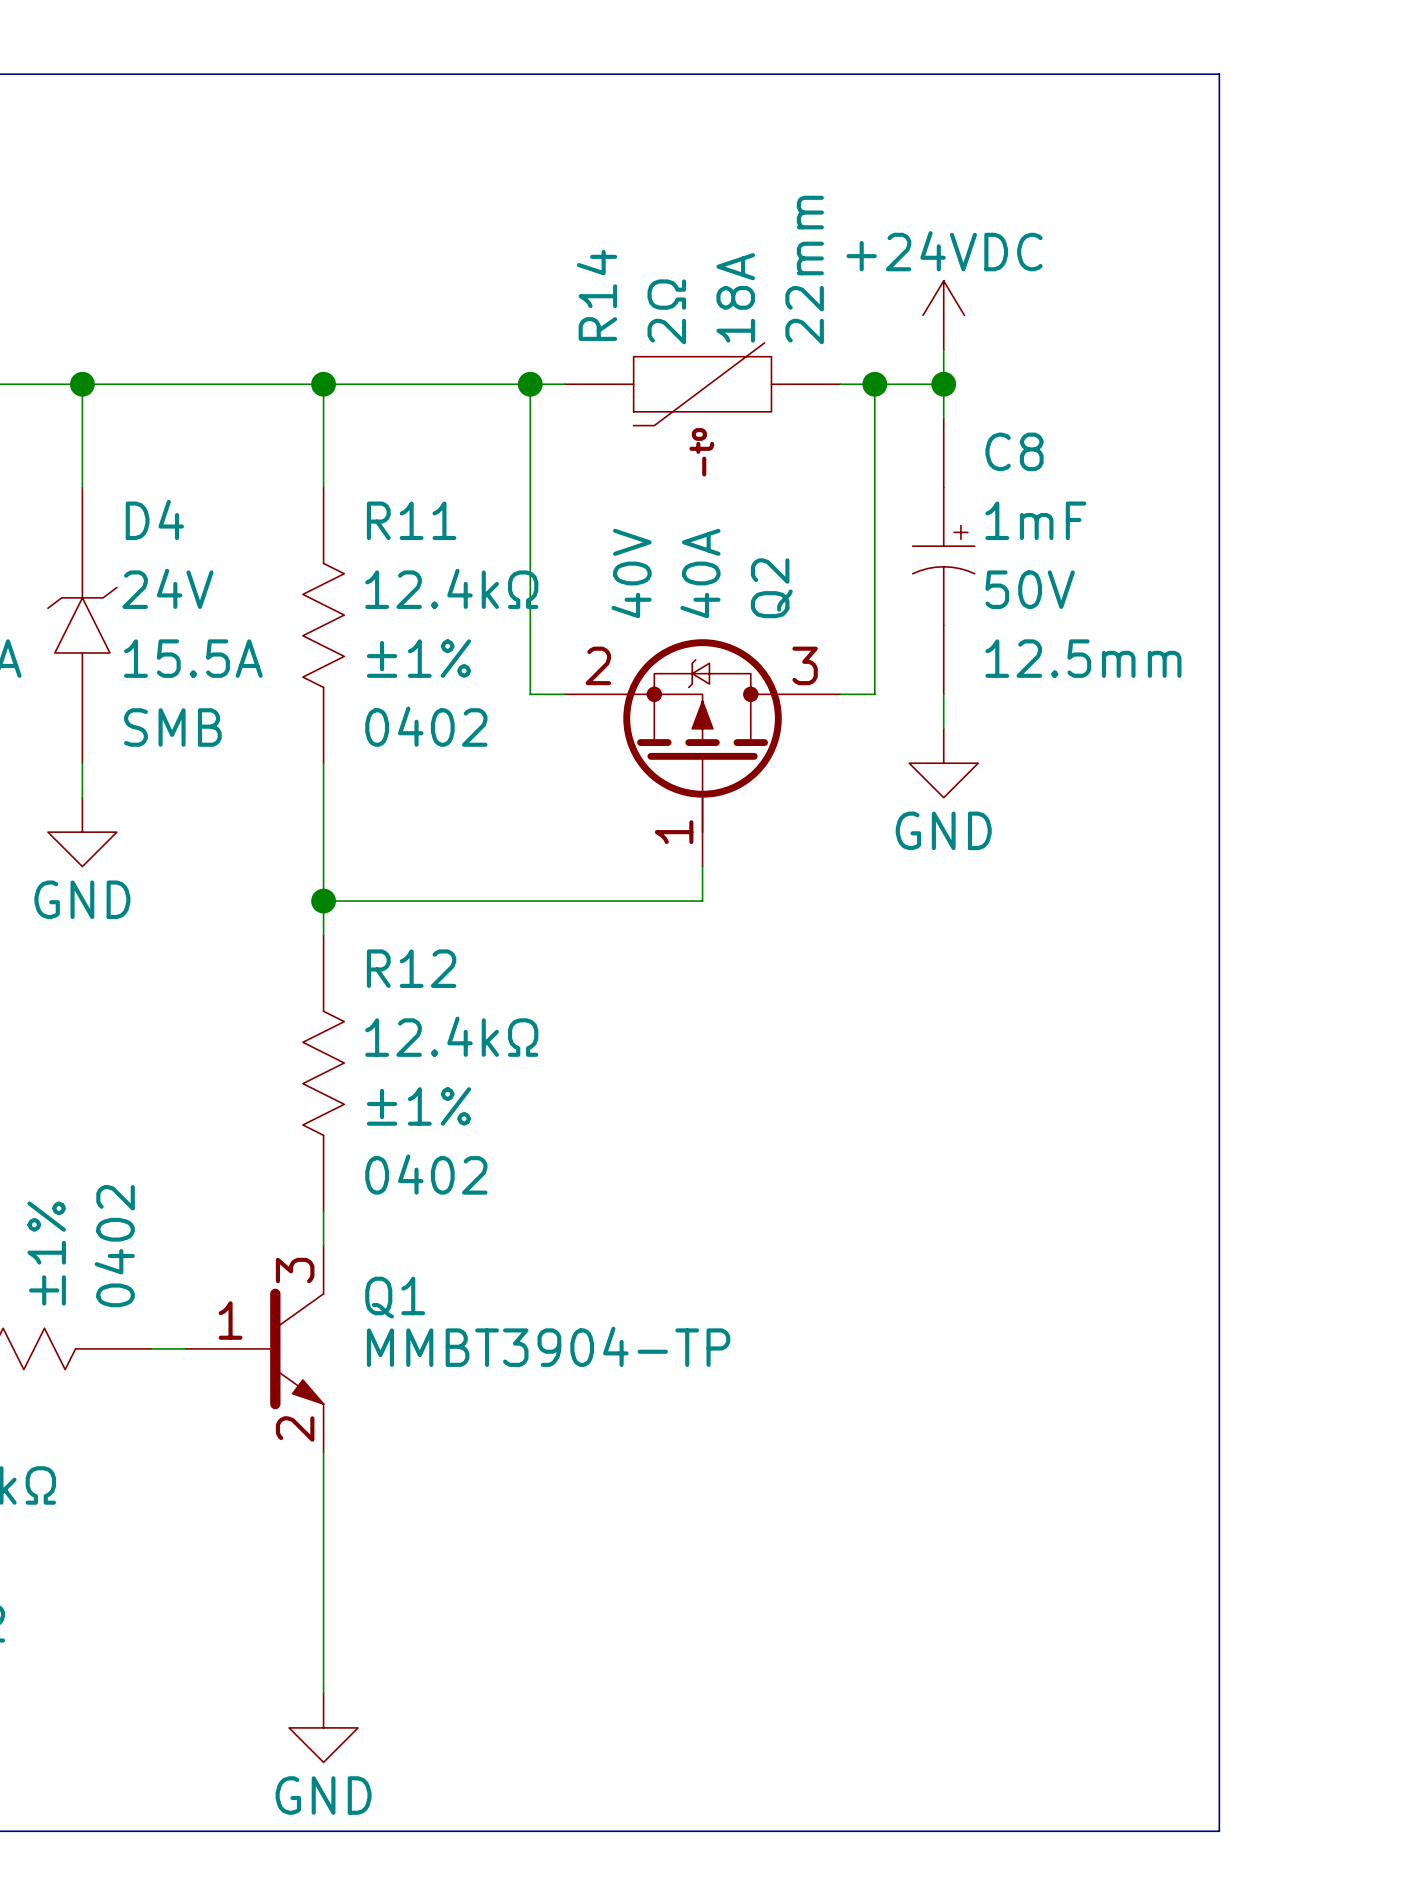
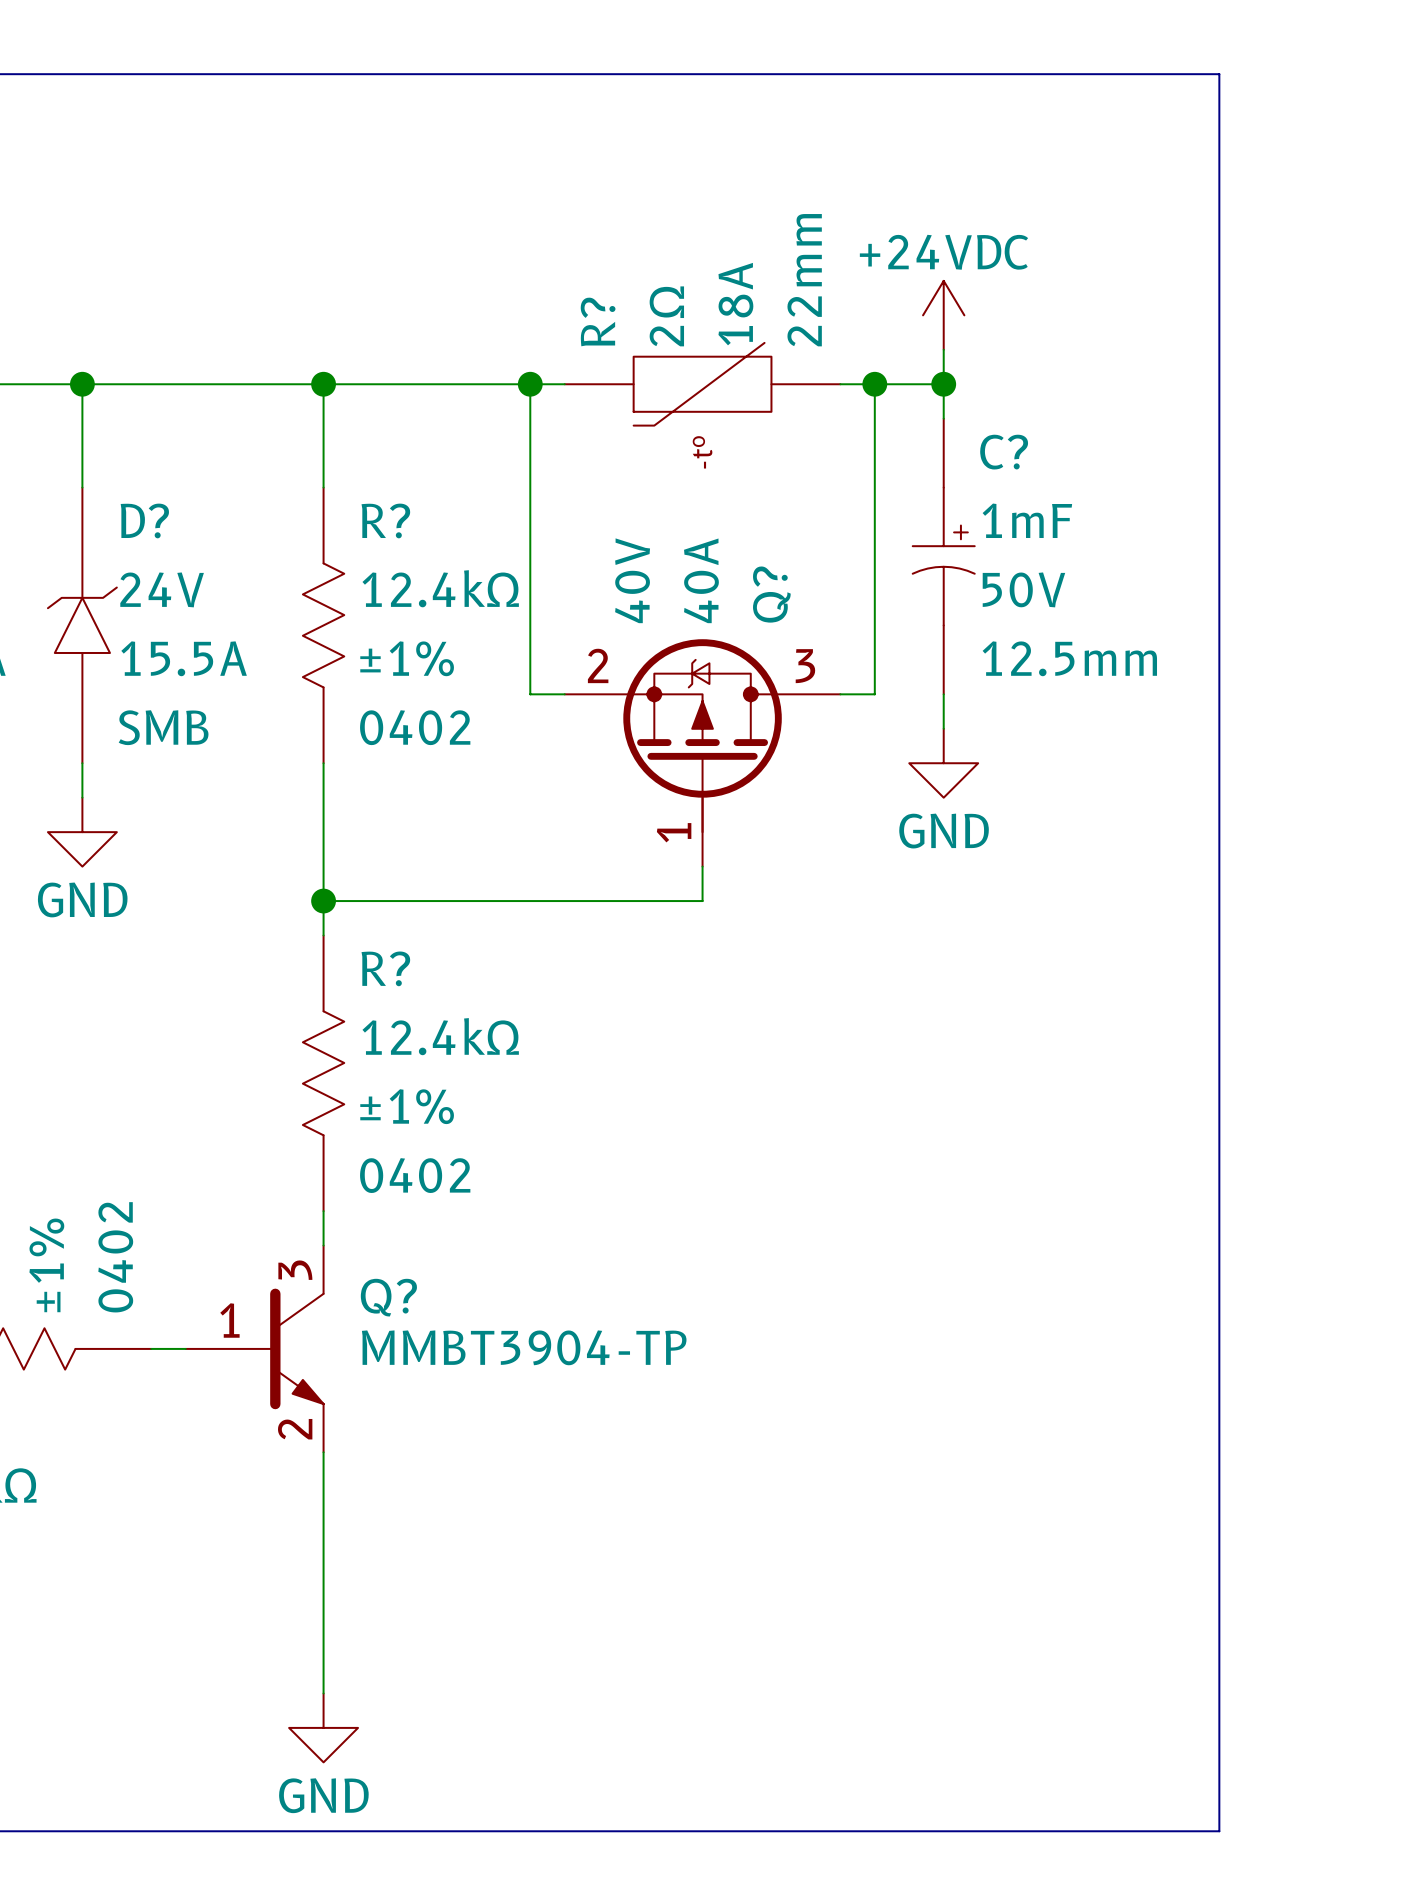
R14 name: R14 (597, 295) -> R? (598, 321)
C8 name: C8 (1014, 451) -> C? (1004, 452)
D4 name: D4 (154, 519) -> D? (144, 520)
R11 name: R11 (411, 520) -> R? (385, 520)
Q2 name: Q2 (771, 588) -> Q? (771, 594)
R12 name: R12 (411, 968) -> R? (385, 968)
Q1 name: Q1 (395, 1297) -> Q? (388, 1297)

